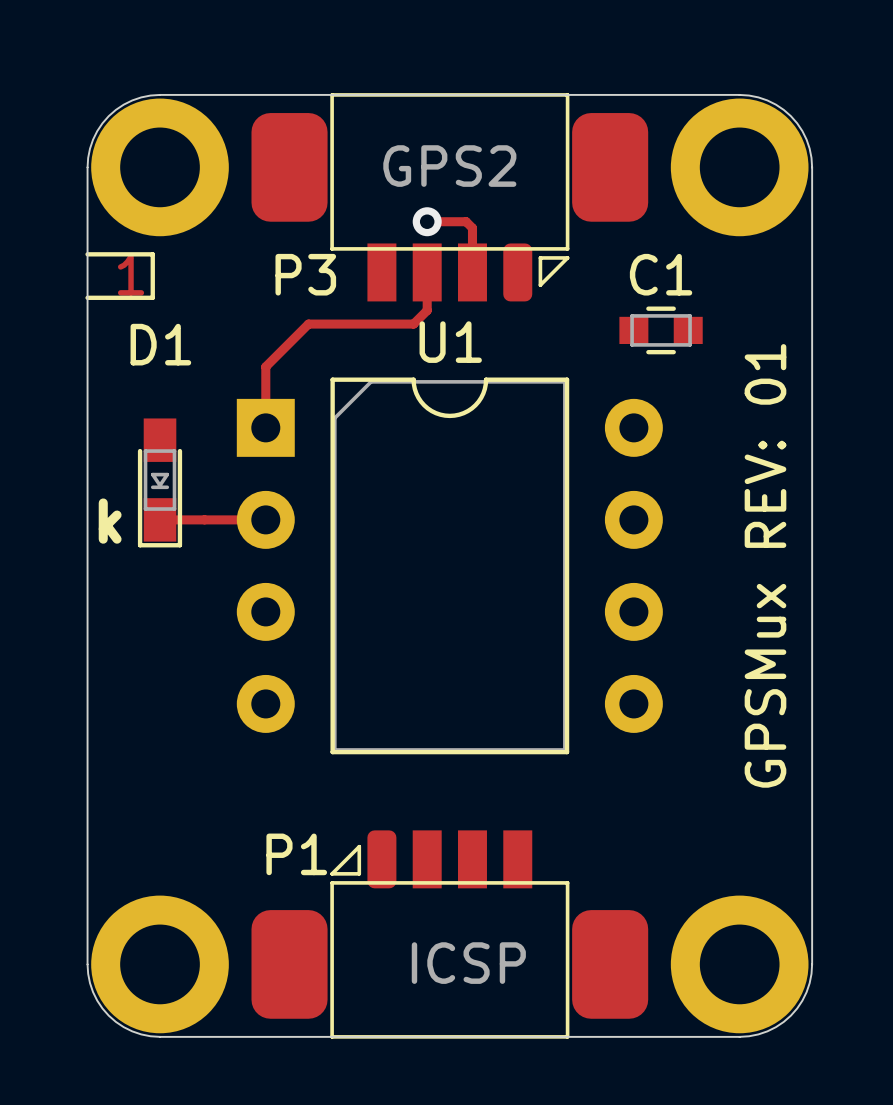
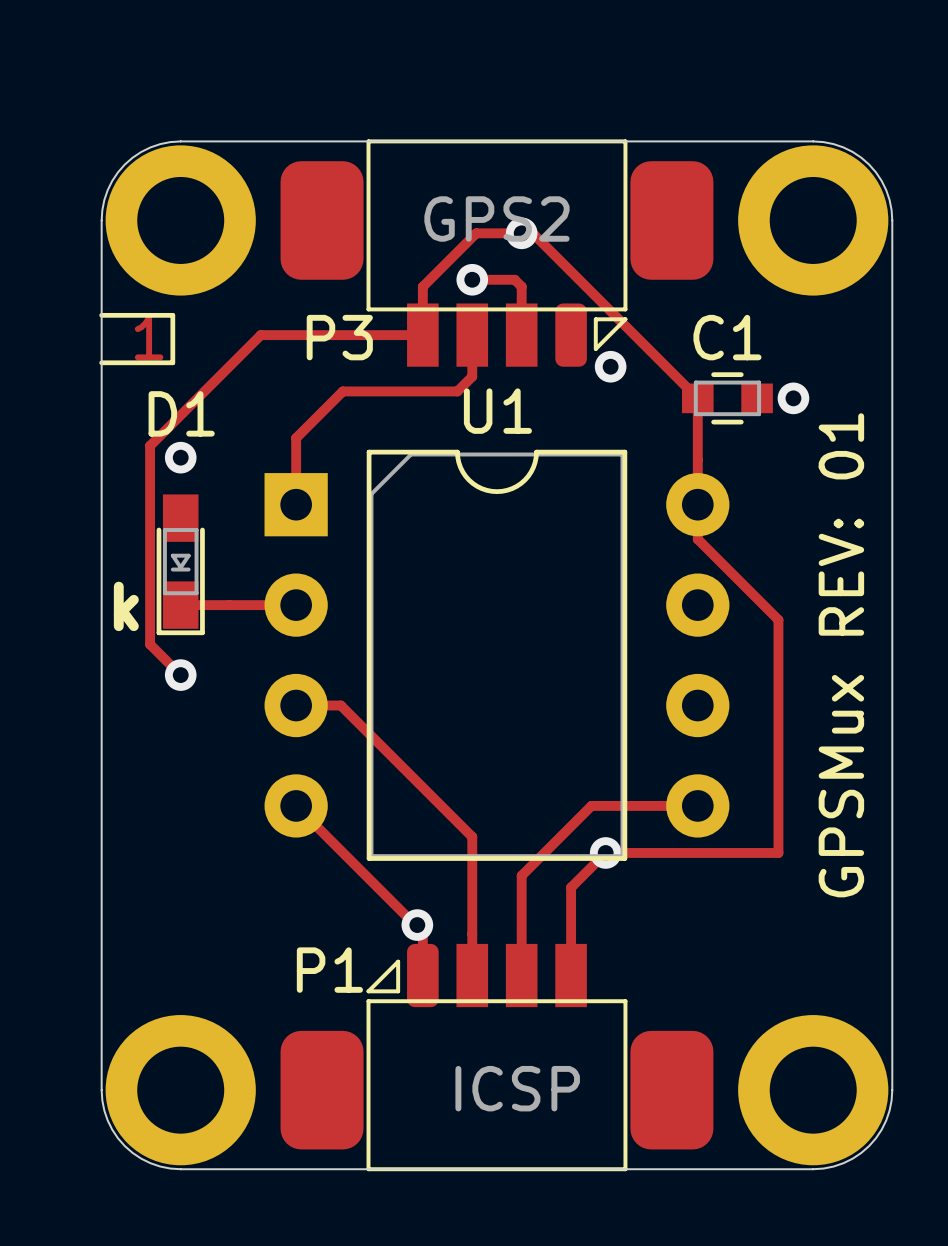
via: none -> (521, 233)
via: none -> (610, 366)
via: none -> (793, 398)
via: none -> (180, 457)
track: none -> (180, 675) (150, 644) (150, 445) (260, 335) (422, 335) (422, 286) (476, 233) (532, 233) (697, 398) (697, 539) (778, 619) (778, 852) (605, 852) (571, 887) (571, 975)
via: none -> (180, 675)
track: none -> (296, 705) (340, 705) (472, 836) (472, 975)
track: none -> (296, 805) (422, 930) (422, 975)
track: none -> (697, 805) (591, 805) (521, 875) (521, 975)
via: none -> (605, 852)
via: none -> (417, 925)

